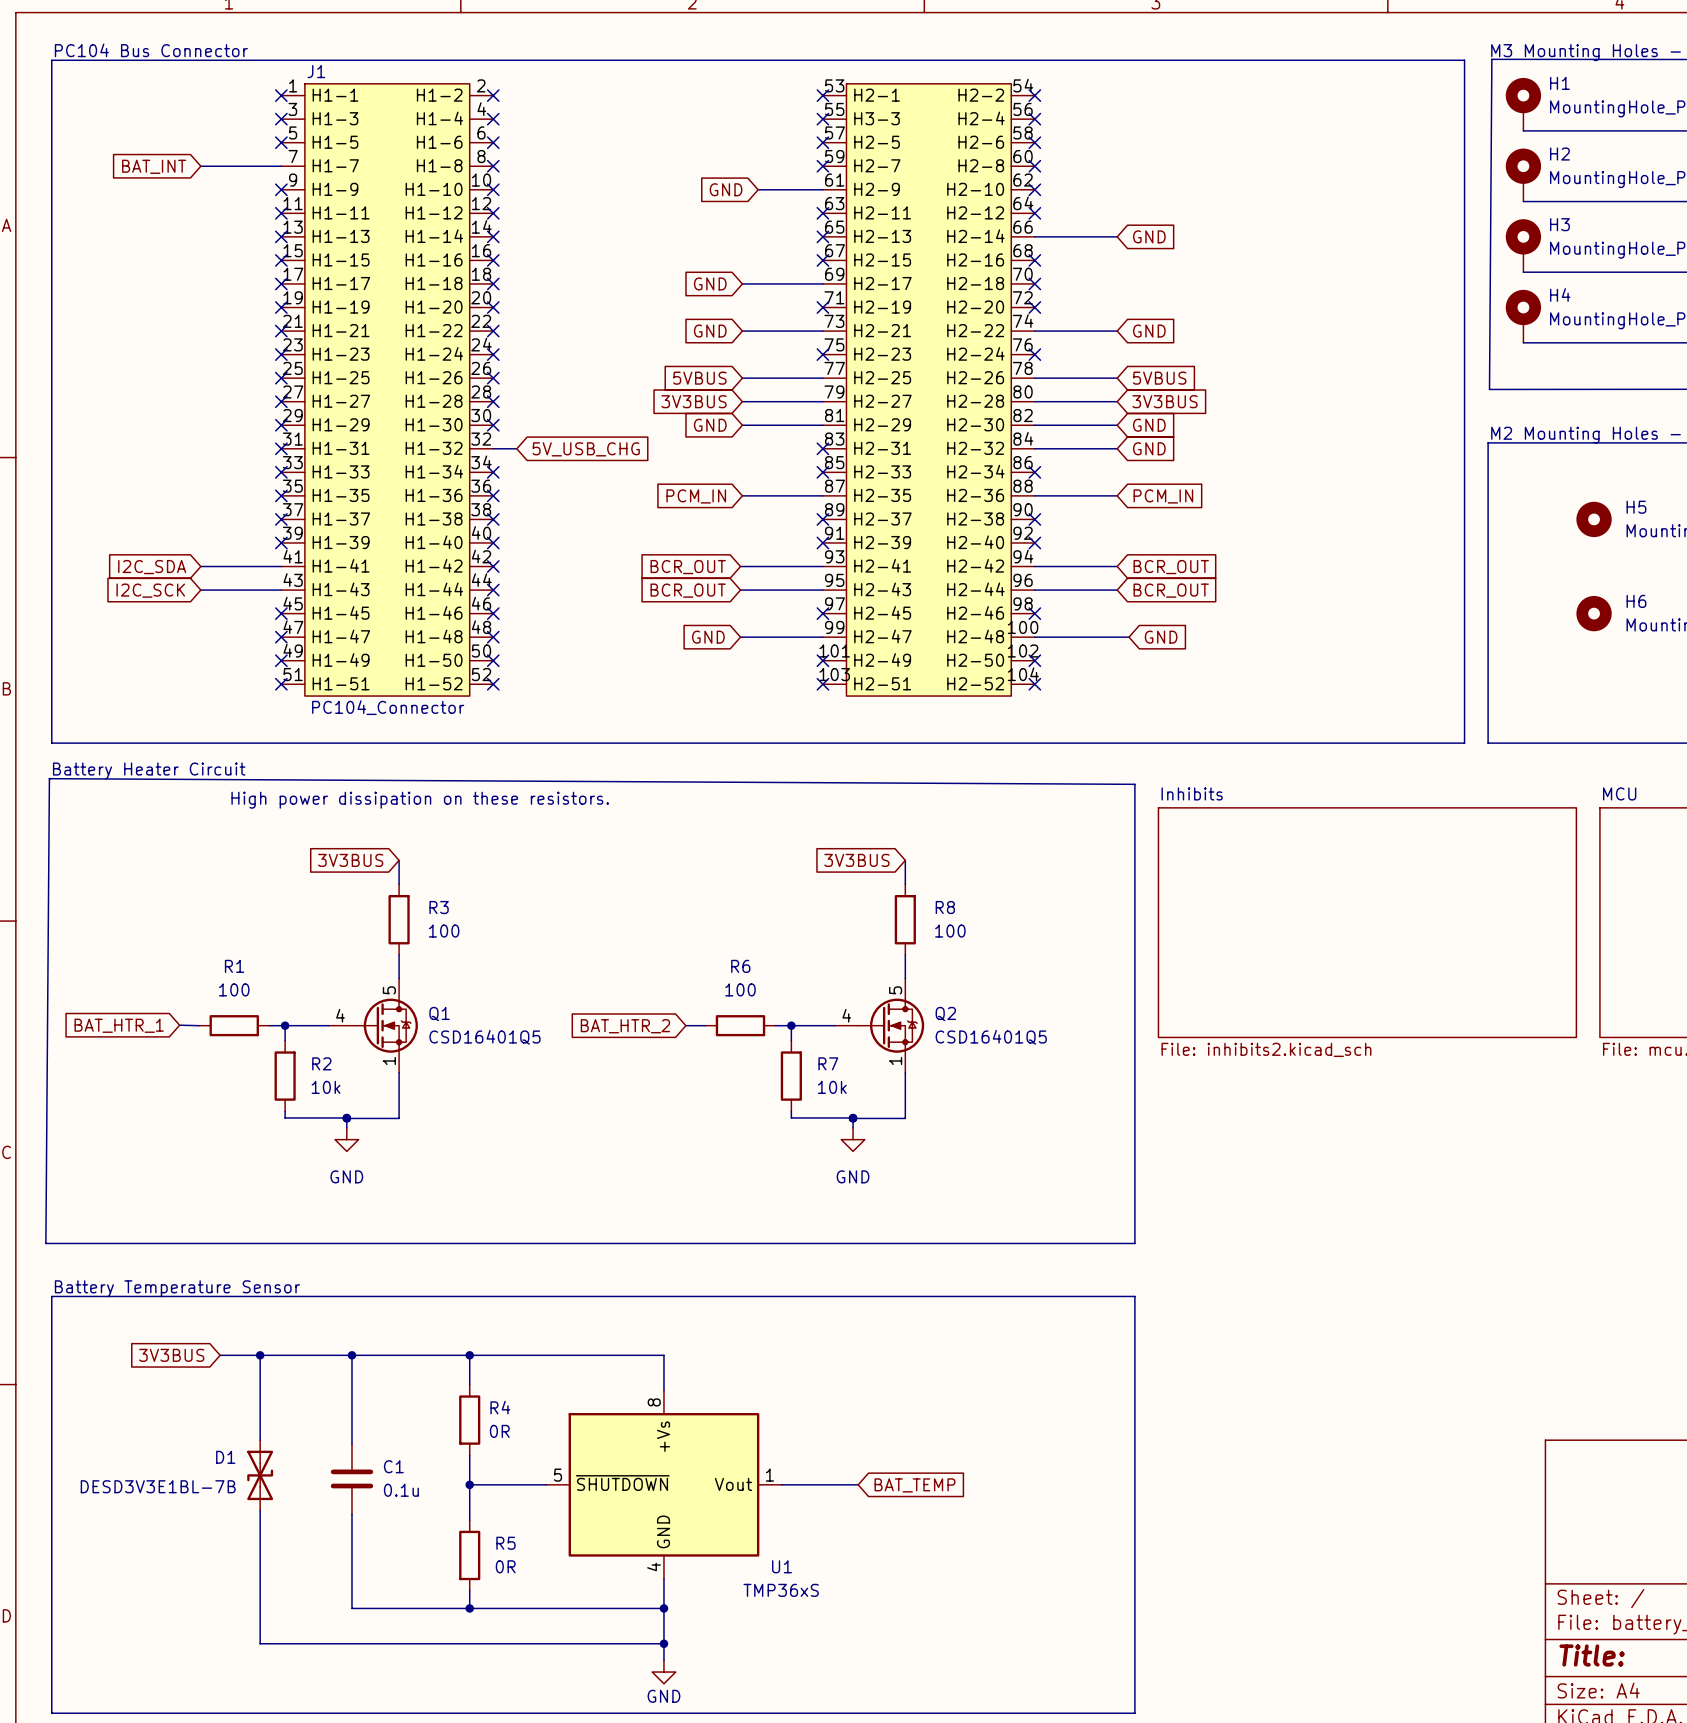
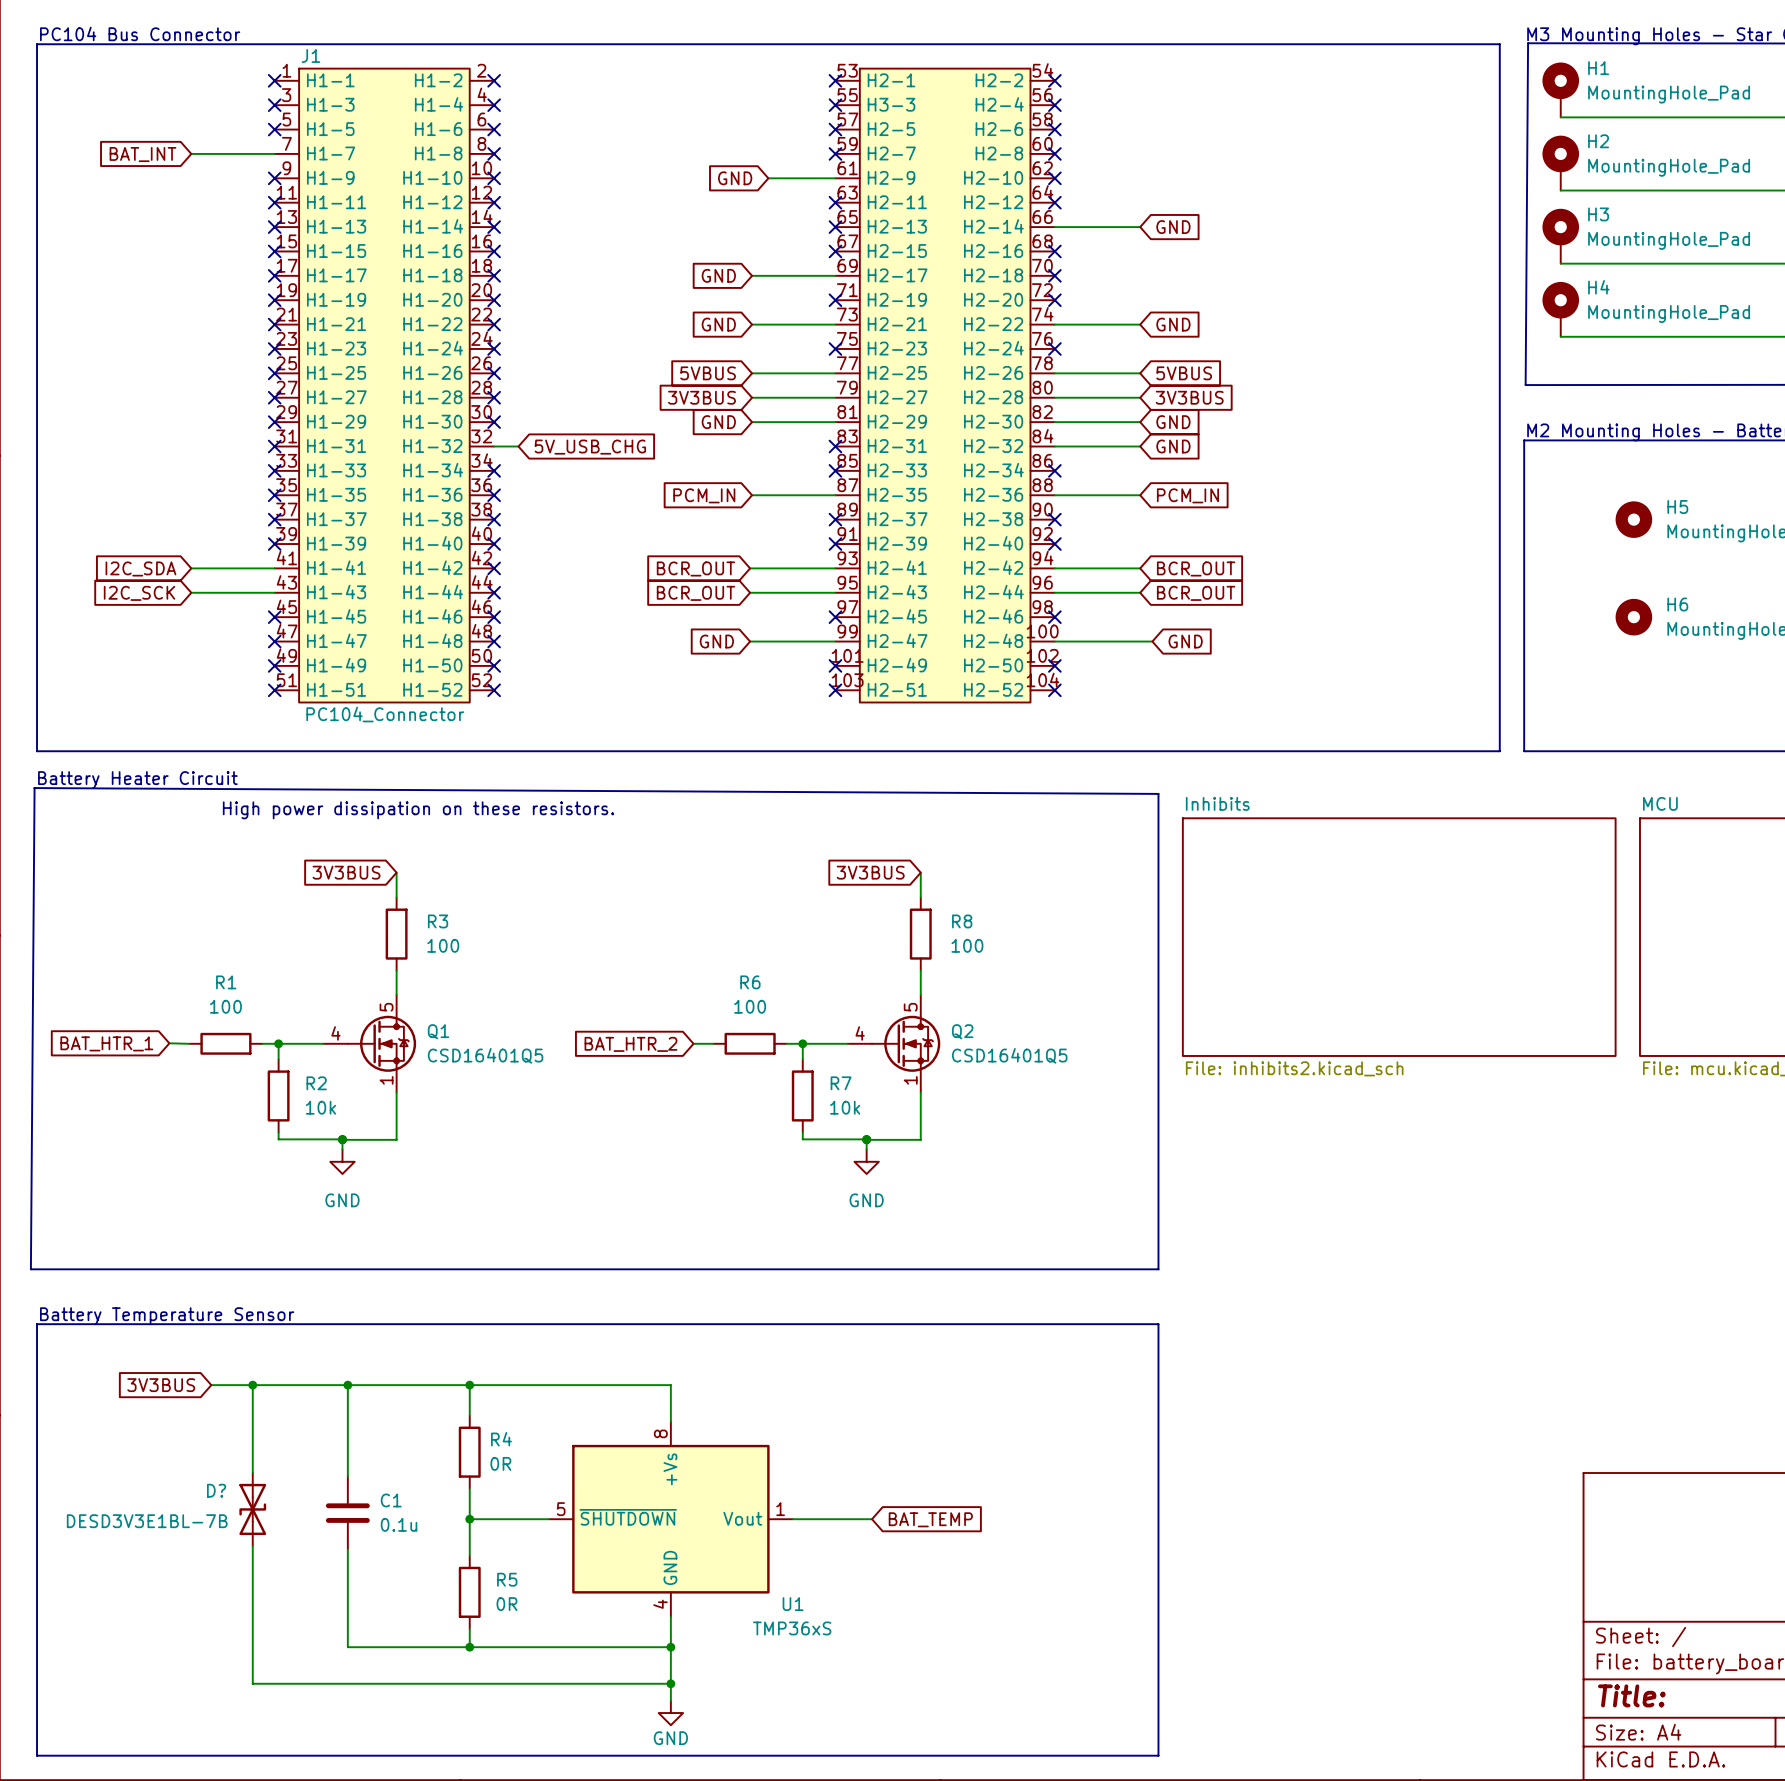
D1 name: D1 (225, 1457) -> D? (216, 1490)

